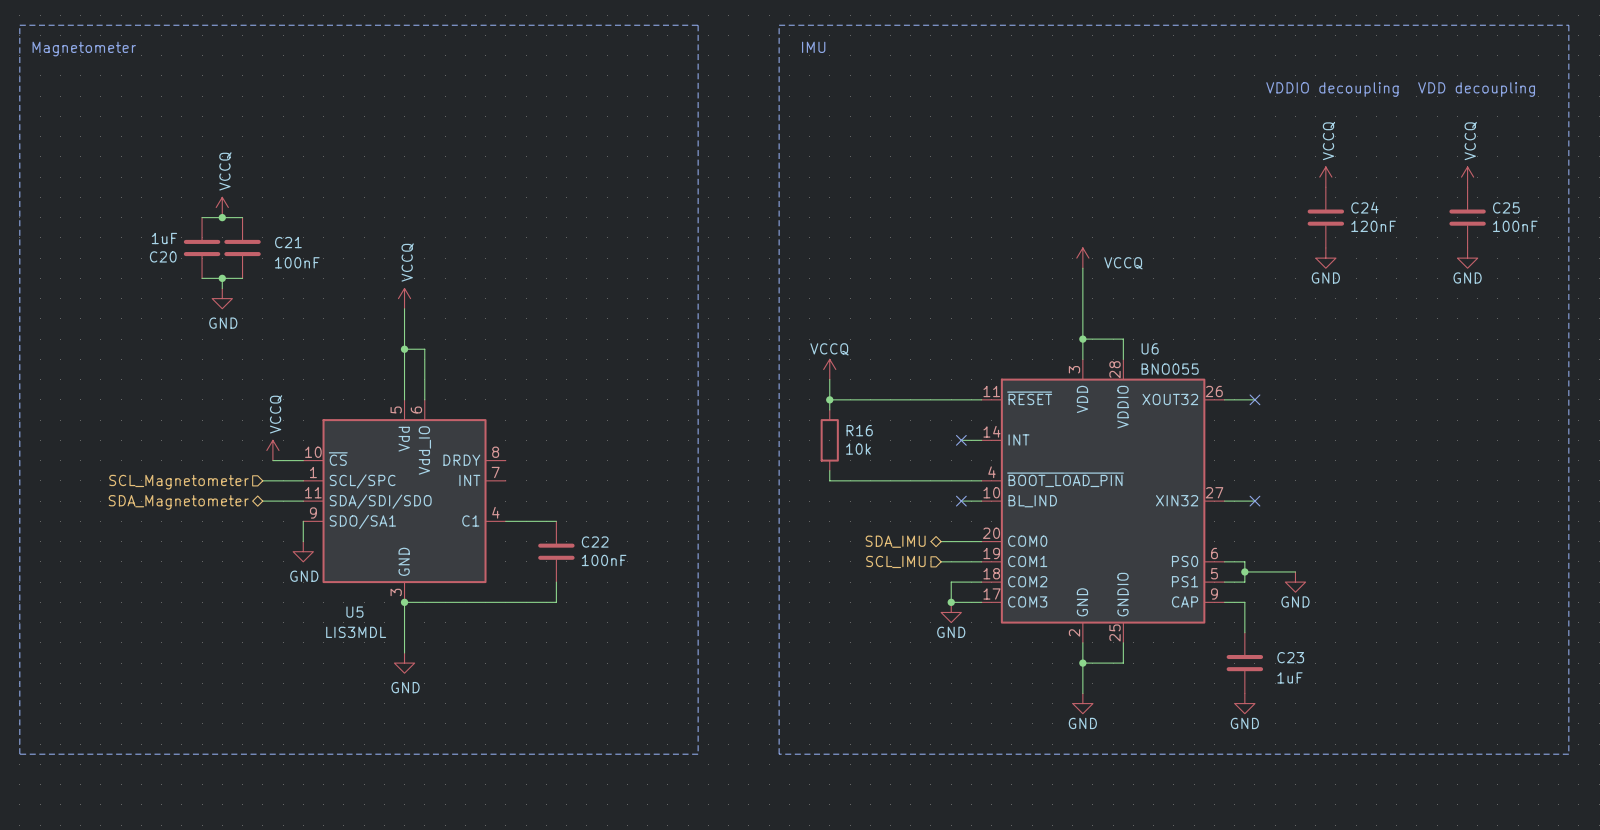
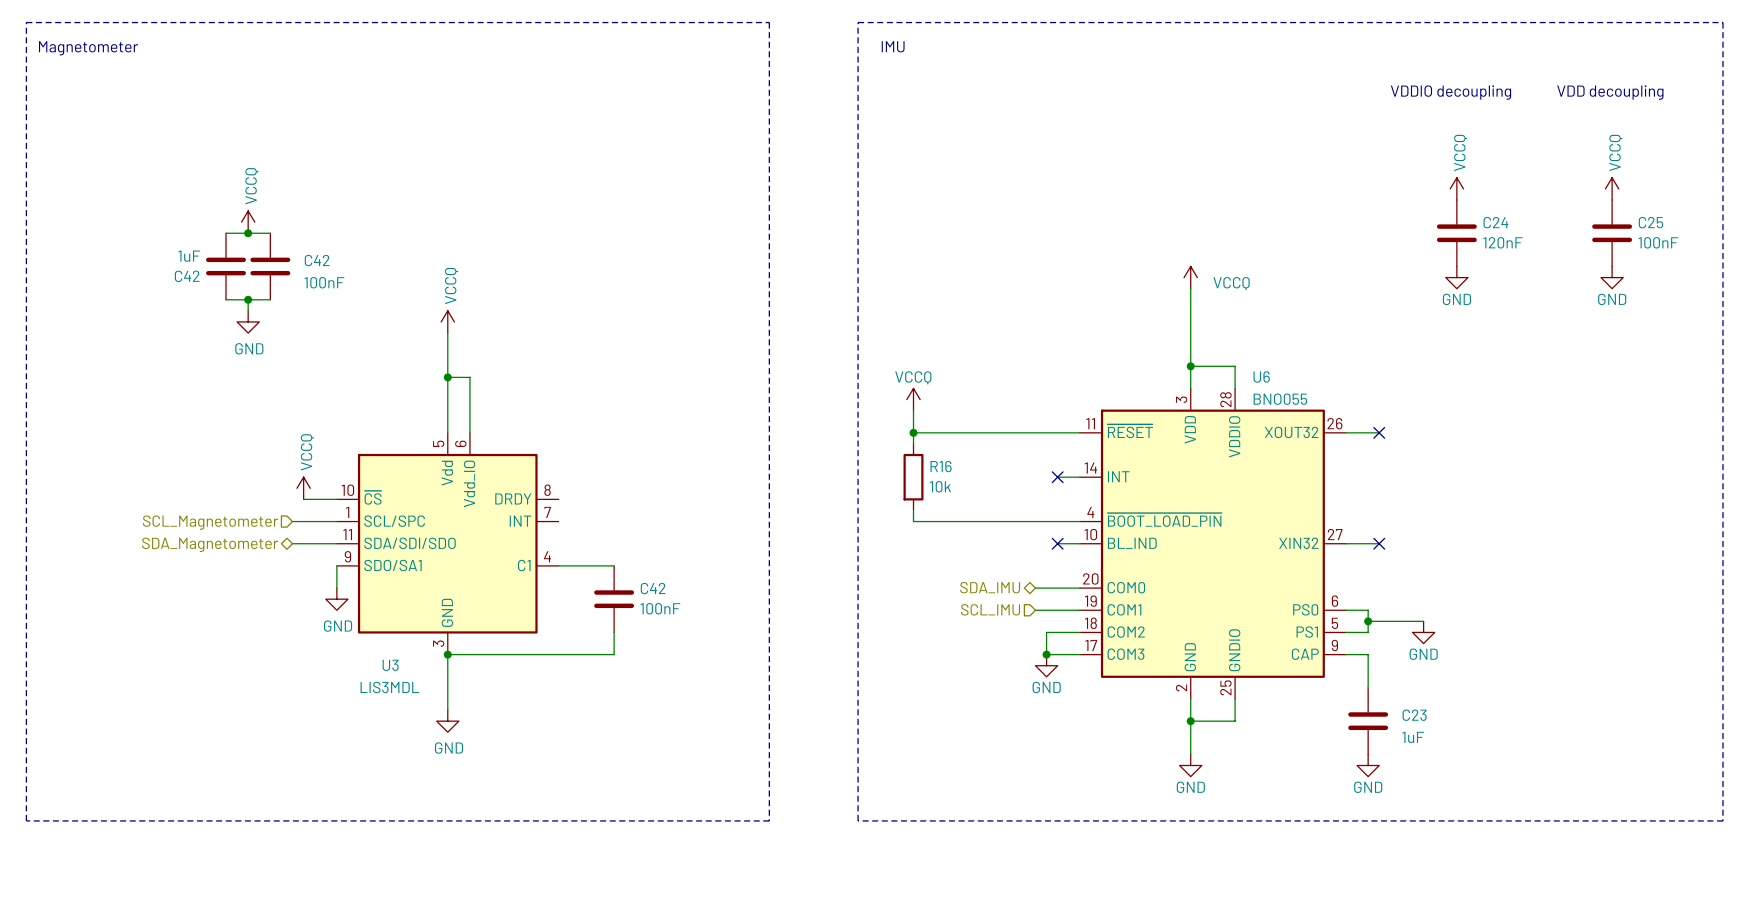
C21 name: C21 (288, 242) -> C42 (317, 260)
C20 name: C20 (163, 256) -> C42 (187, 276)
C22 name: C22 (595, 542) -> C42 (653, 588)
U5 name: U5 (354, 612) -> U3 (390, 665)

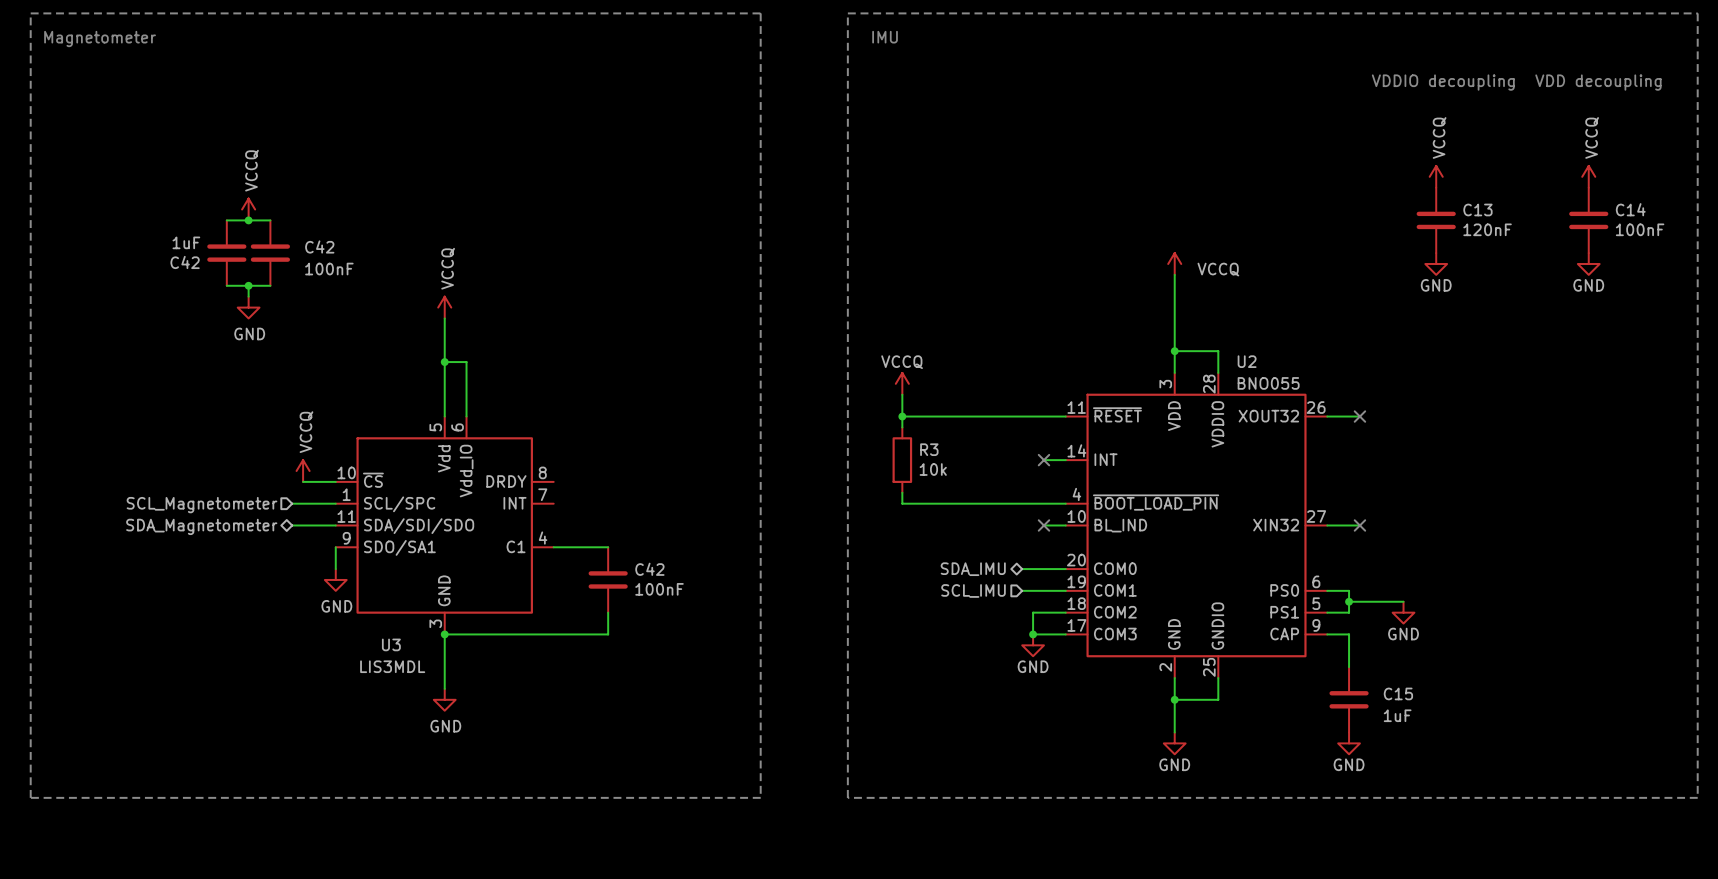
C24 name: C24 (1495, 222) -> C13 (1477, 209)
C25 name: C25 (1650, 222) -> C14 (1630, 209)
U6 name: U6 (1261, 376) -> U2 (1247, 361)
R16 name: R16 (941, 466) -> R3 (929, 449)
C23 name: C23 (1414, 715) -> C15 (1398, 693)

